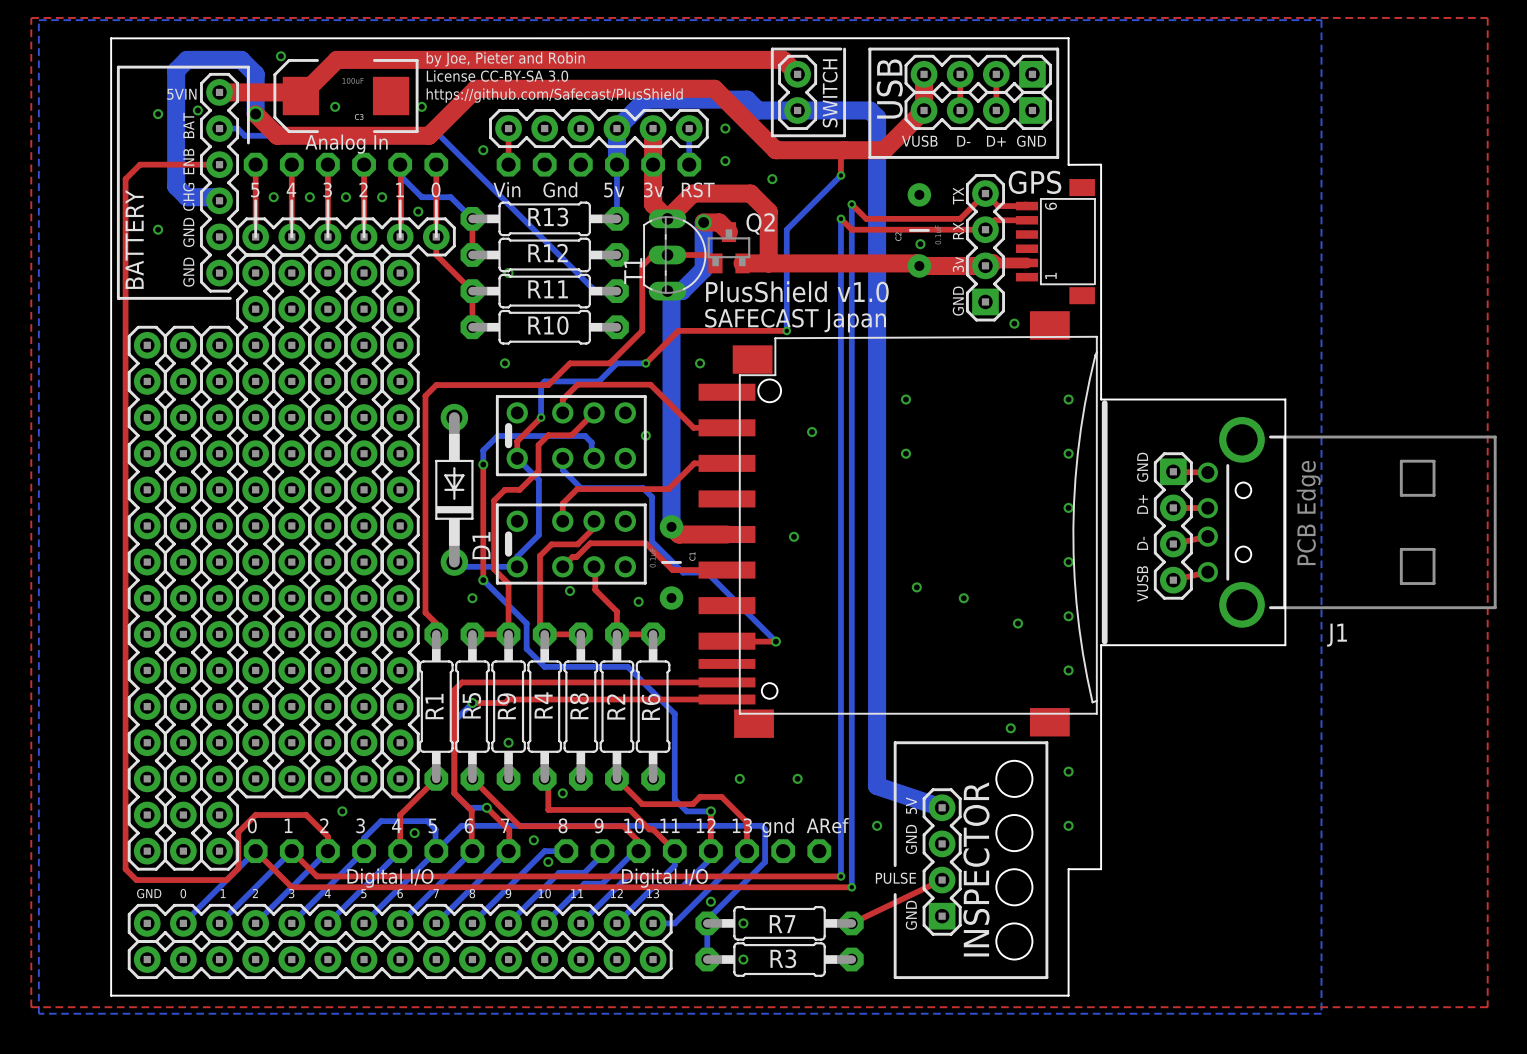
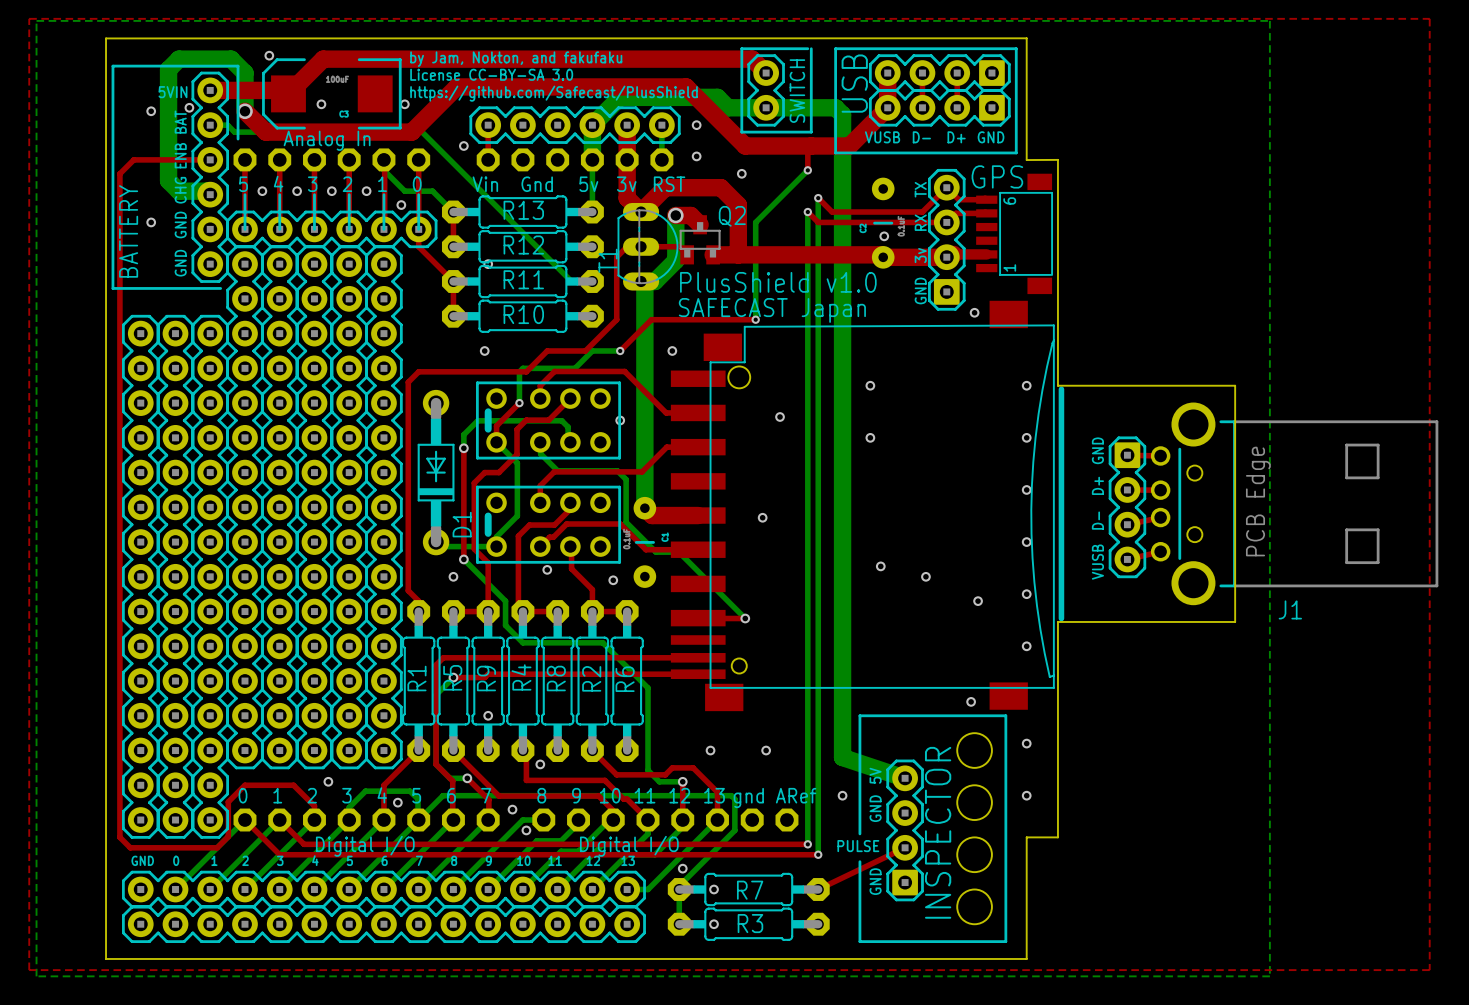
text: by Joe, Pieter and Robin (505, 59) -> by Jam, Nokton, and fakufaku (516, 59)

